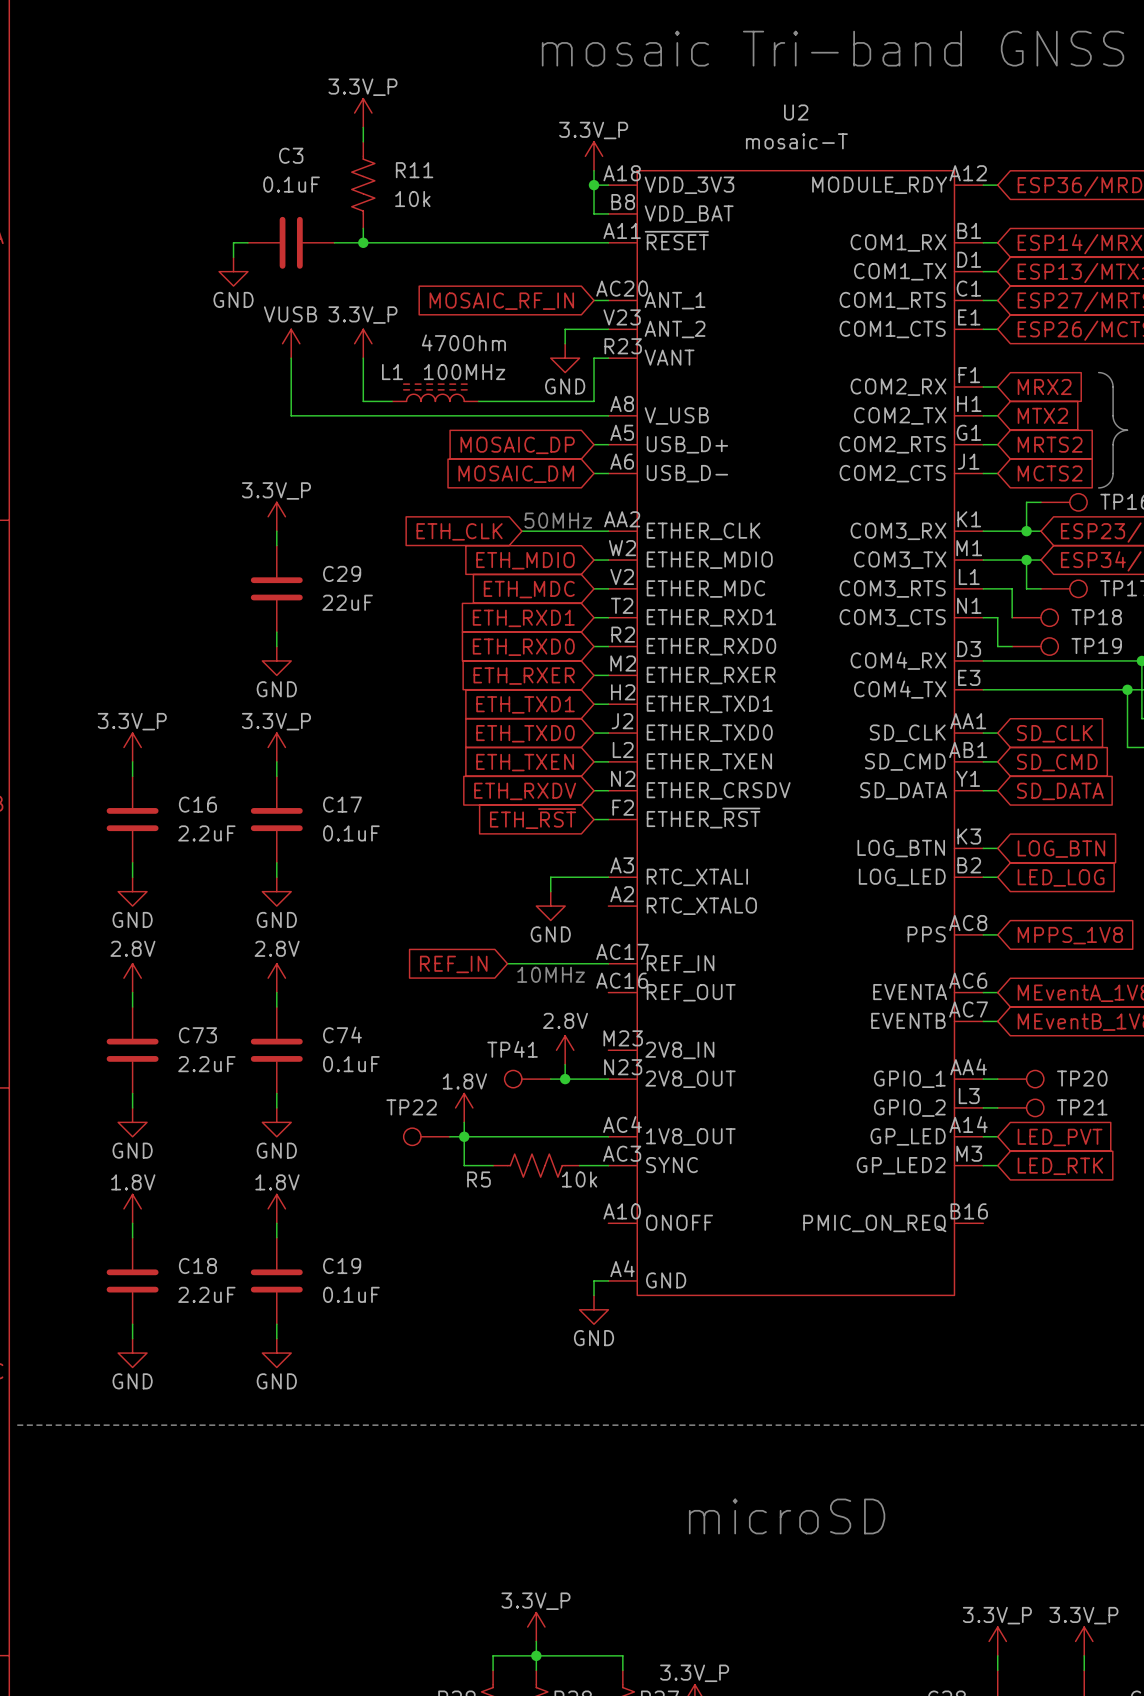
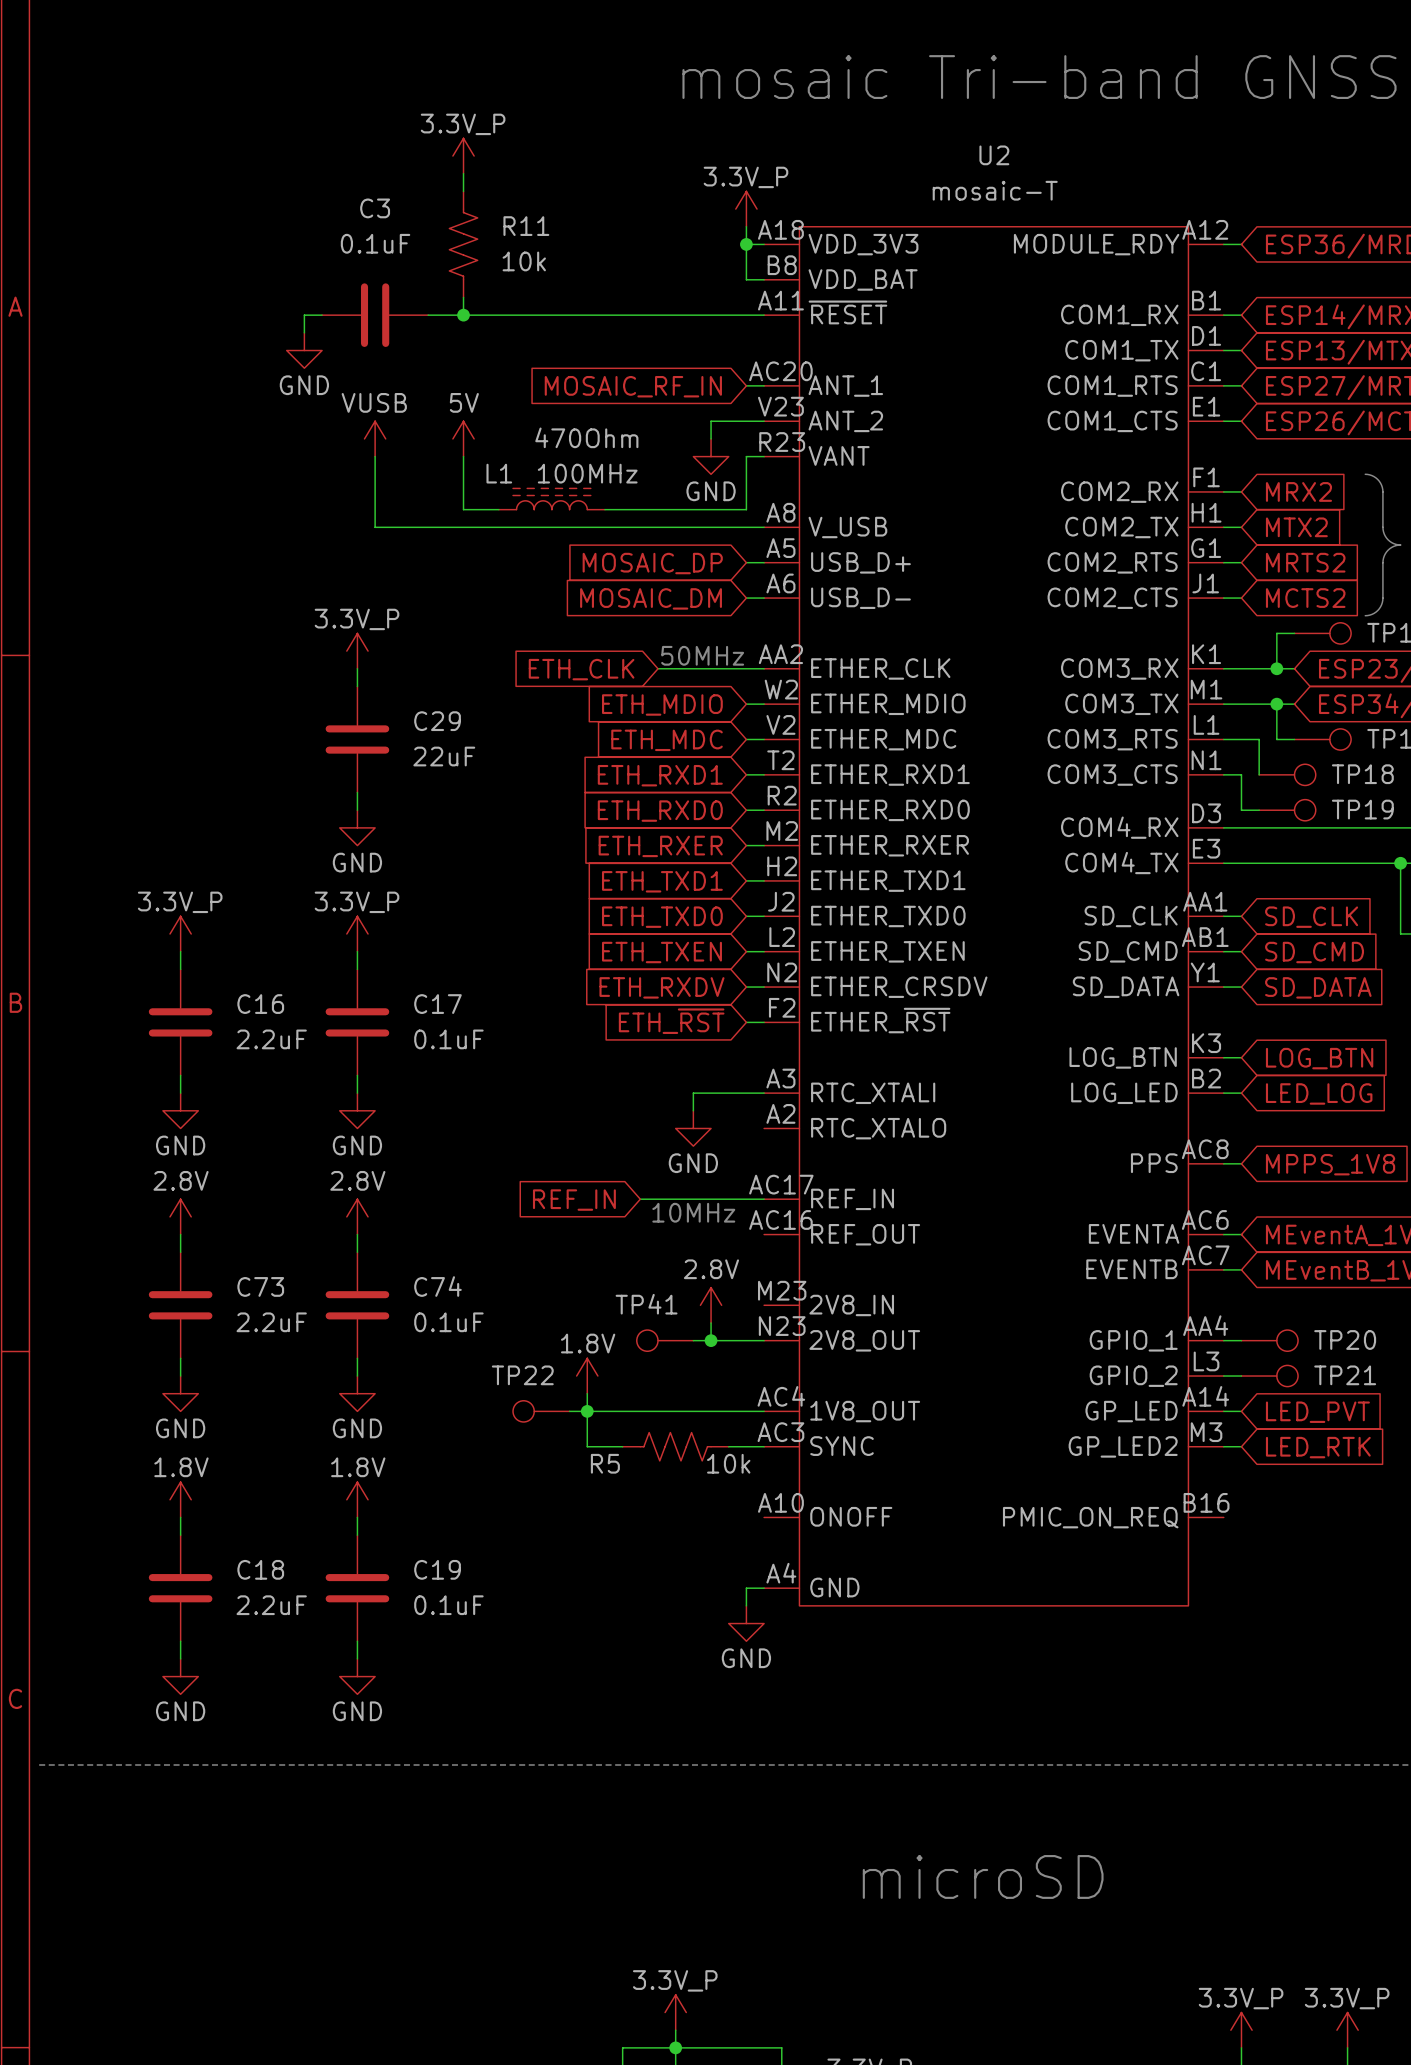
power symbol: 3.3V_P (363, 343) -> 5V (463, 438)

